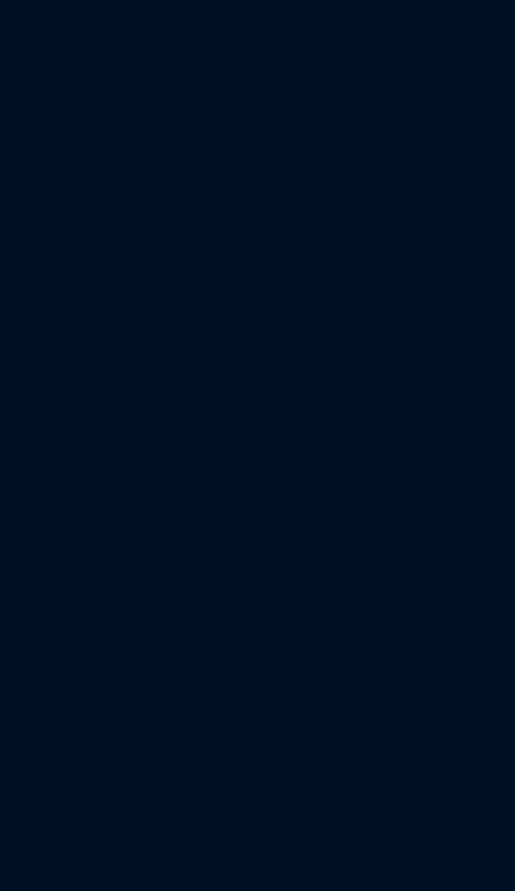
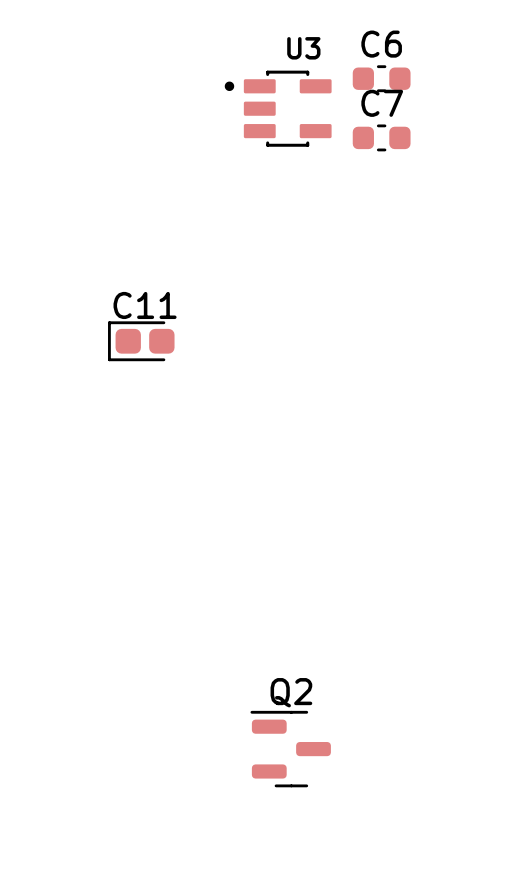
C6: none -> (381, 78)
U3: none -> (278, 108)
C7: none -> (381, 137)
C11: none -> (141, 341)
Q2: none -> (290, 749)

